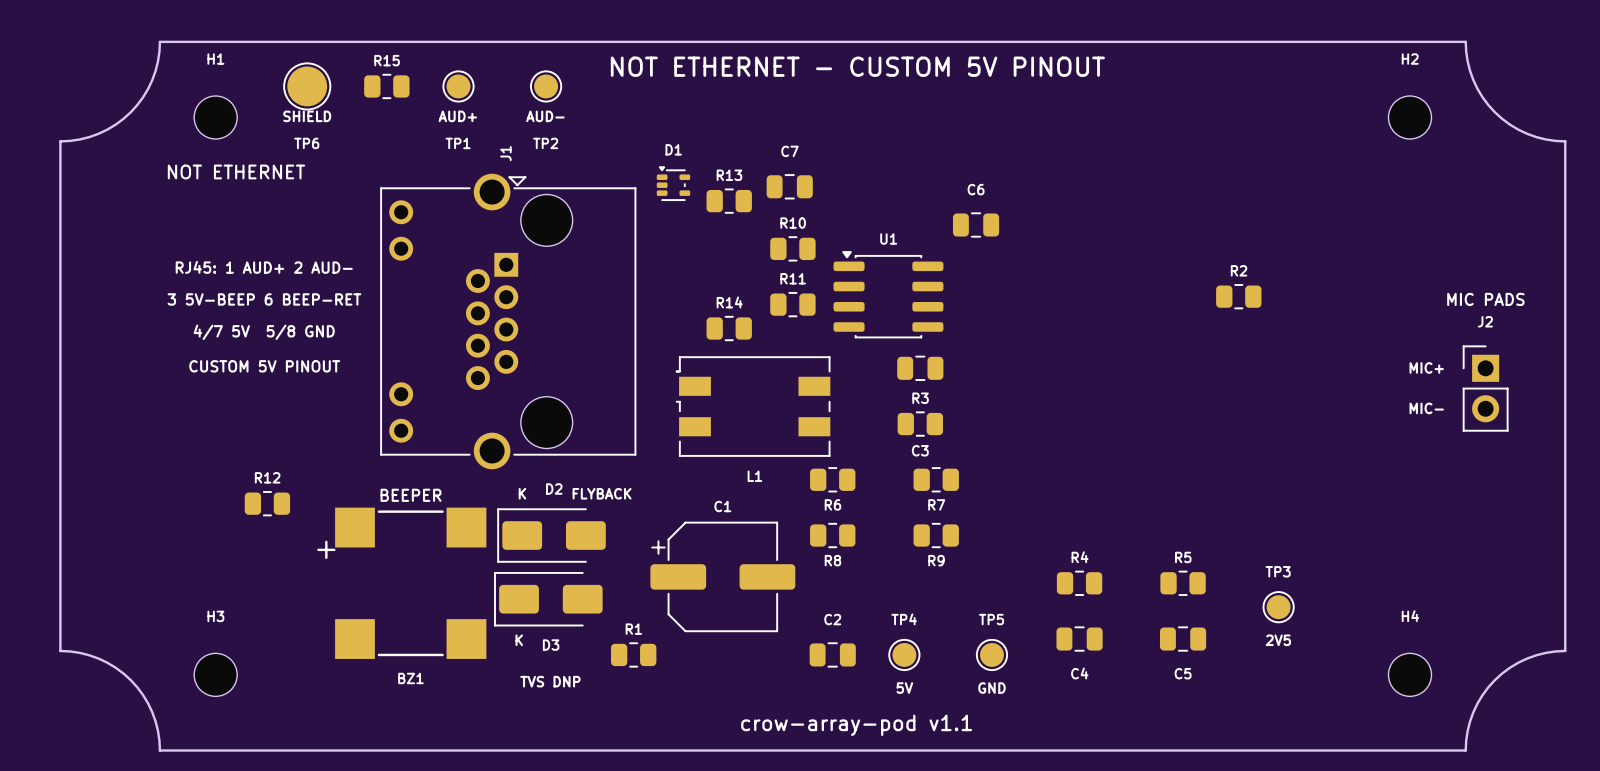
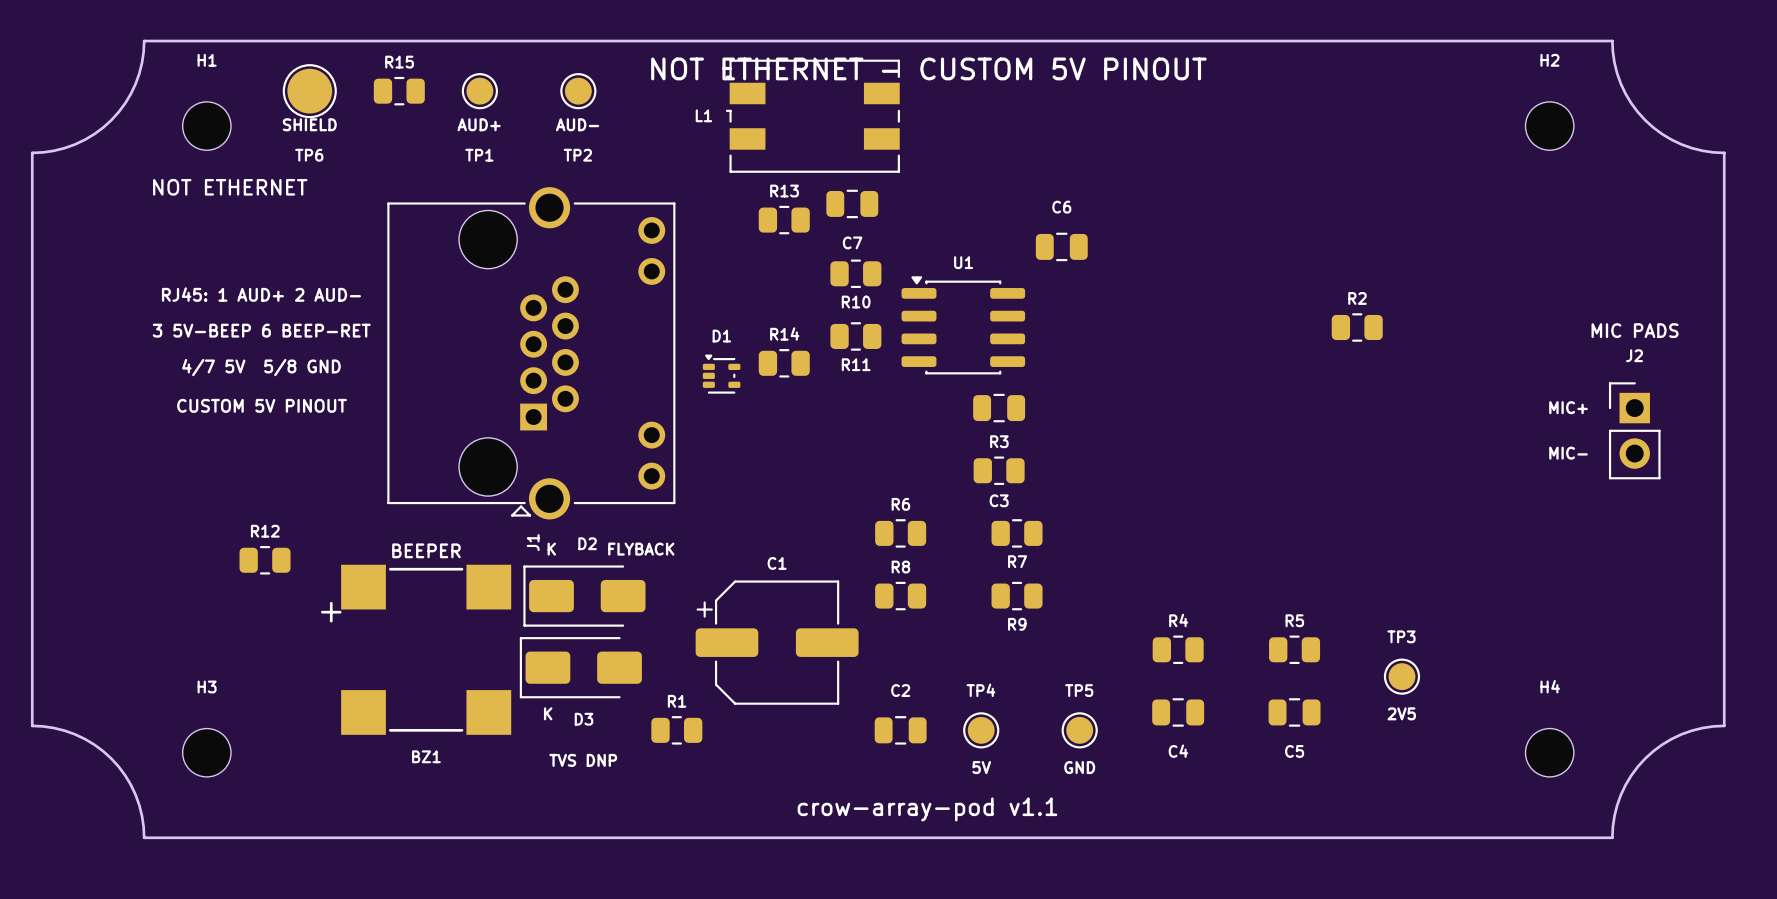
C7 name position: C7 (789, 151) -> C7 (852, 242)
D1 position: (673, 183) -> (721, 374)
R10 name position: R10 (793, 223) -> R10 (856, 302)
R11 name position: R11 (793, 278) -> R11 (856, 364)
J1 rotation: 0° (508, 321) -> 180° (531, 353)
L1 position: (753, 406) -> (812, 116)
L1 name position: L1 (754, 476) -> L1 (703, 115)
R6 name position: R6 (832, 504) -> R6 (900, 504)
R8 name position: R8 (832, 560) -> R8 (900, 567)

